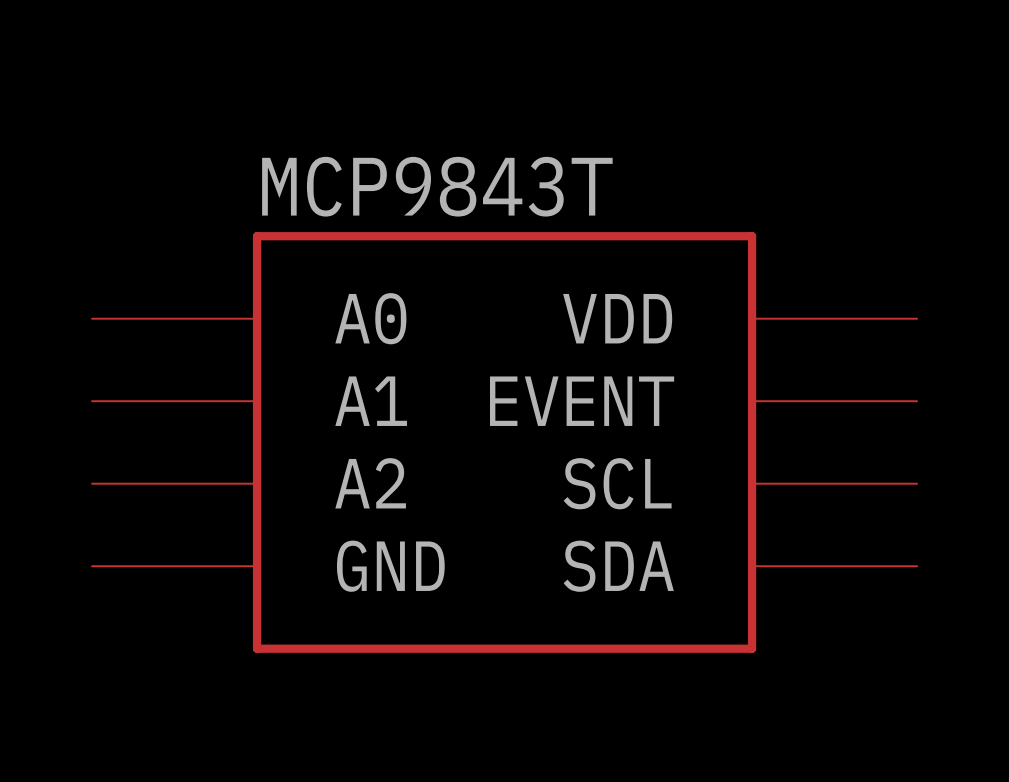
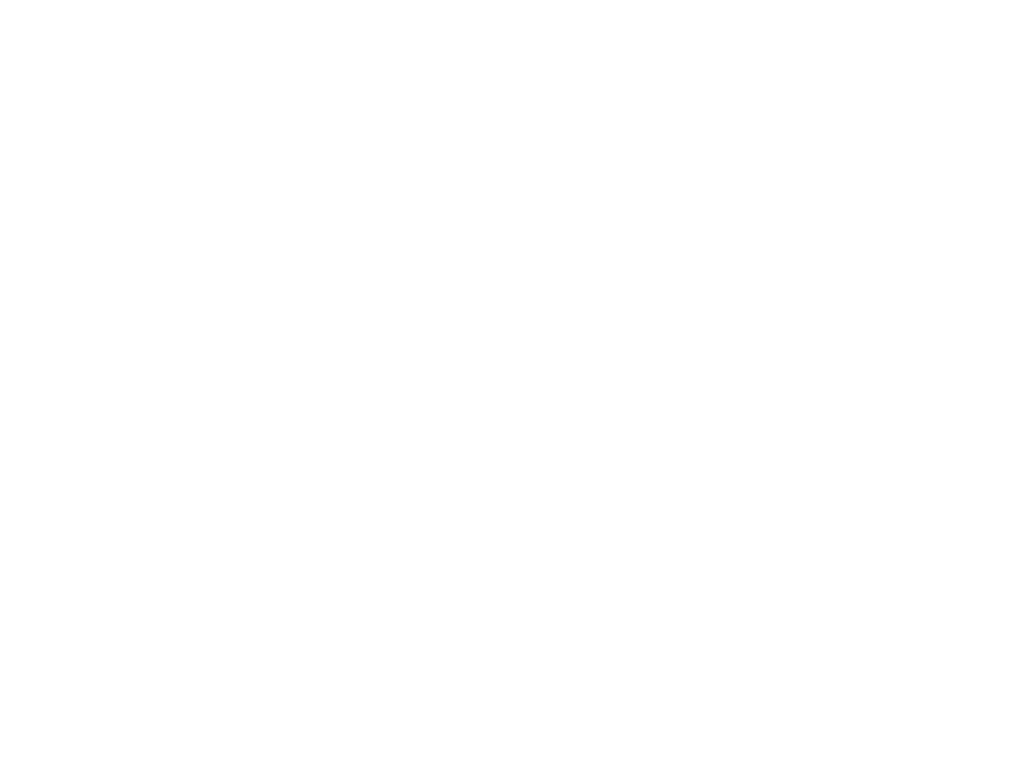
part: (504, 442) -> none

